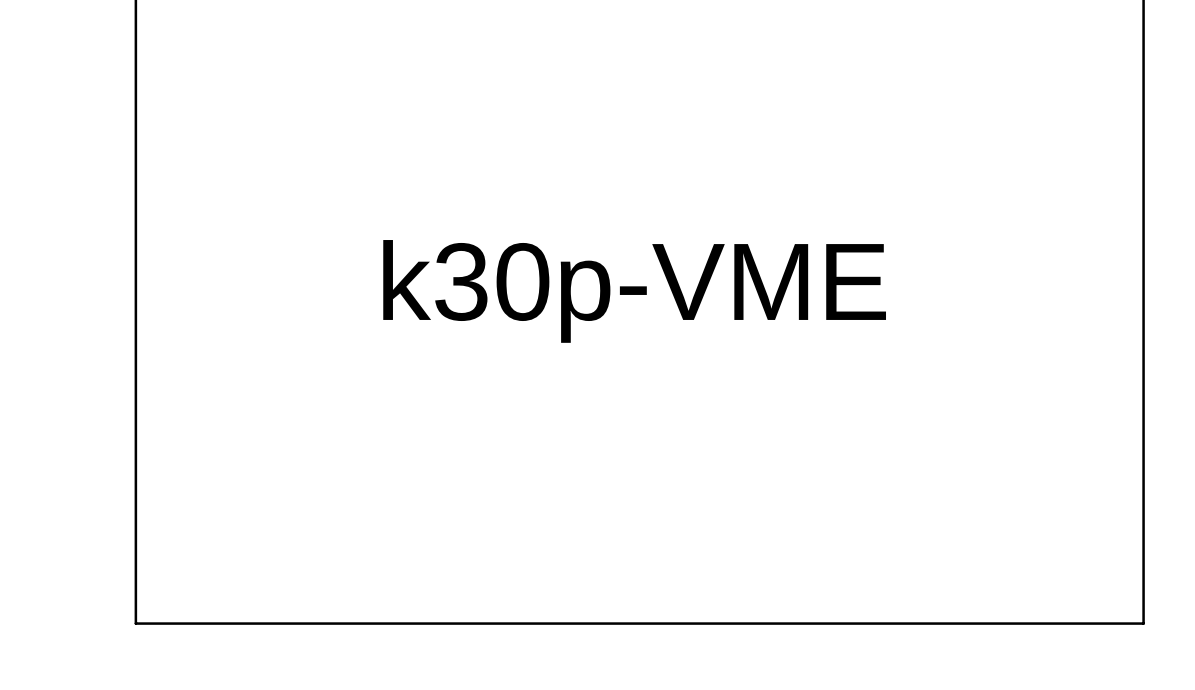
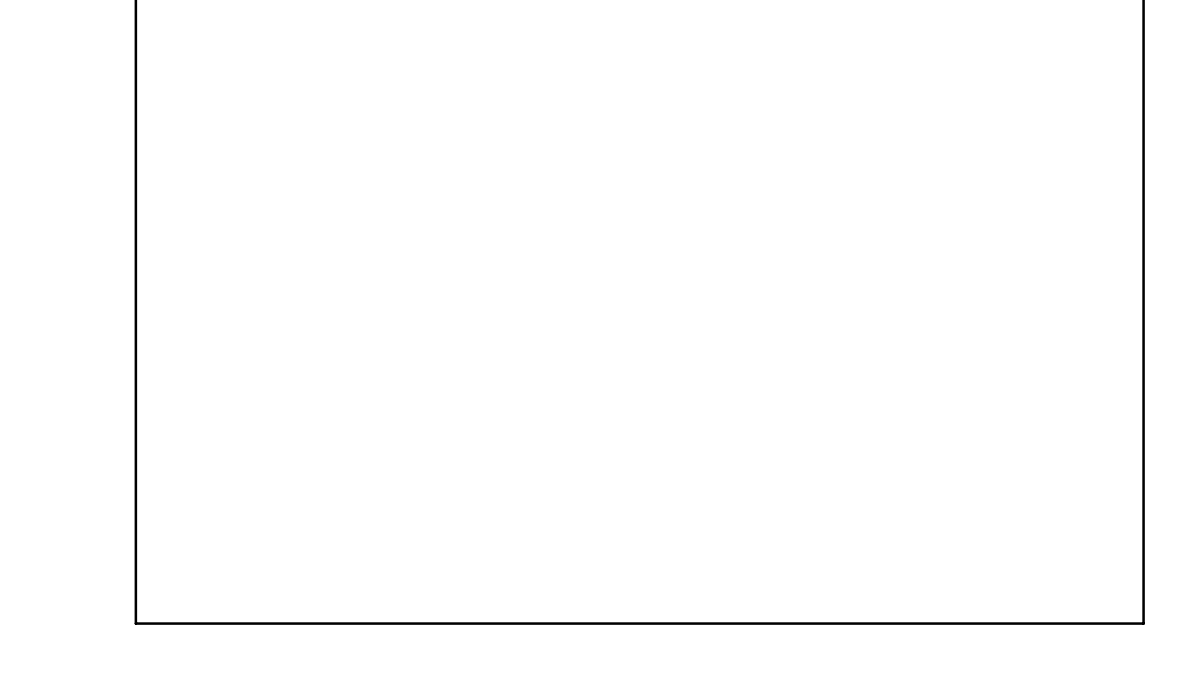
text: k30p-VME (634, 291) -> none

